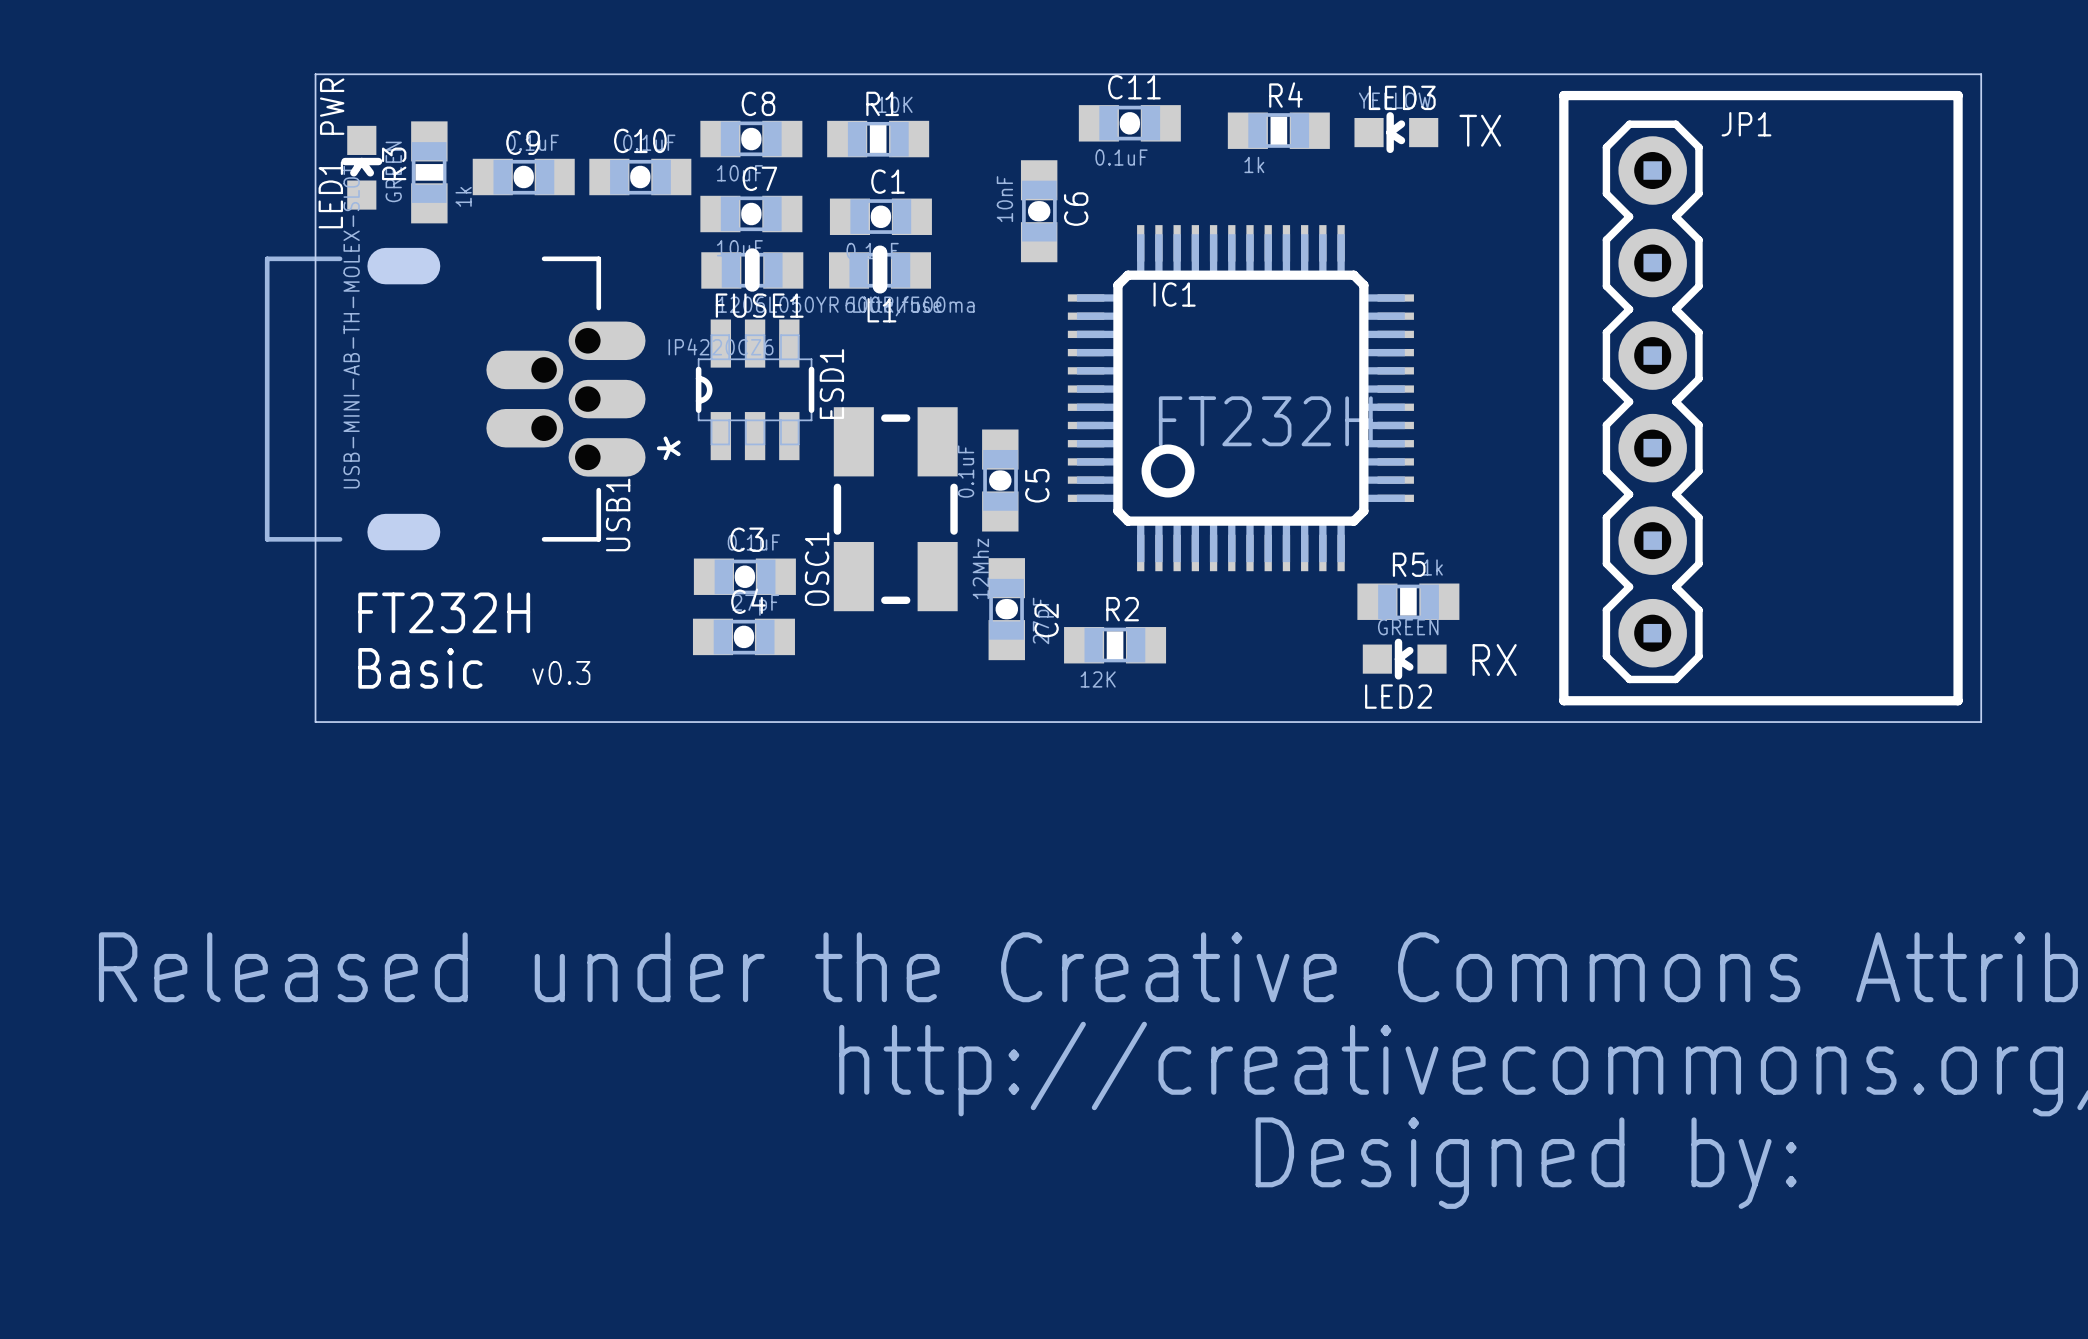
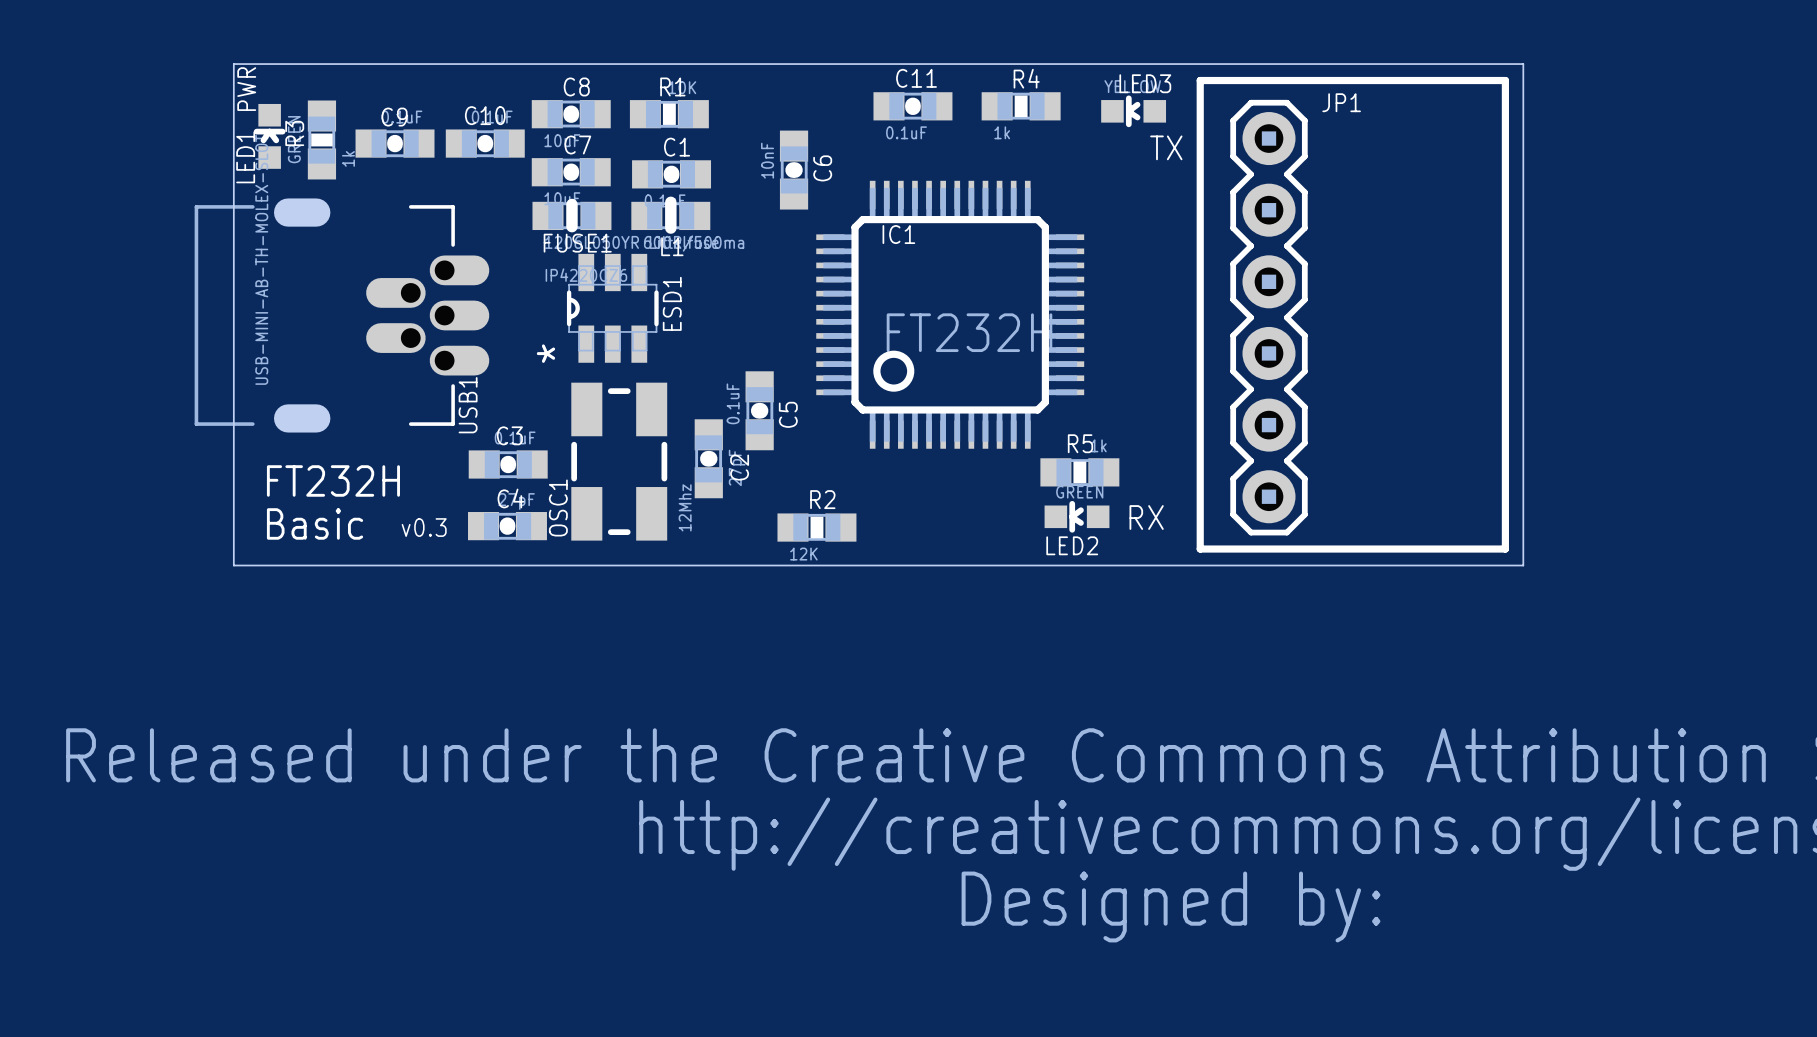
LED3 name position: LED3 (1402, 97) -> LED3 (1145, 83)
C11 position: (1129, 123) -> (912, 106)
R4 position: (1278, 130) -> (1021, 106)
text position: TX (1480, 130) -> TX (1166, 147)
LED3 position: (1396, 132) -> (1133, 111)
ESD1 position: (755, 389) -> (612, 308)
C5 position: (1000, 480) -> (759, 410)
OSC1 position: (895, 509) -> (619, 461)
C3 position: (744, 576) -> (508, 464)
C2 position: (1006, 609) -> (708, 458)
C4 position: (743, 636) -> (507, 526)
R2 position: (1115, 645) -> (816, 527)

